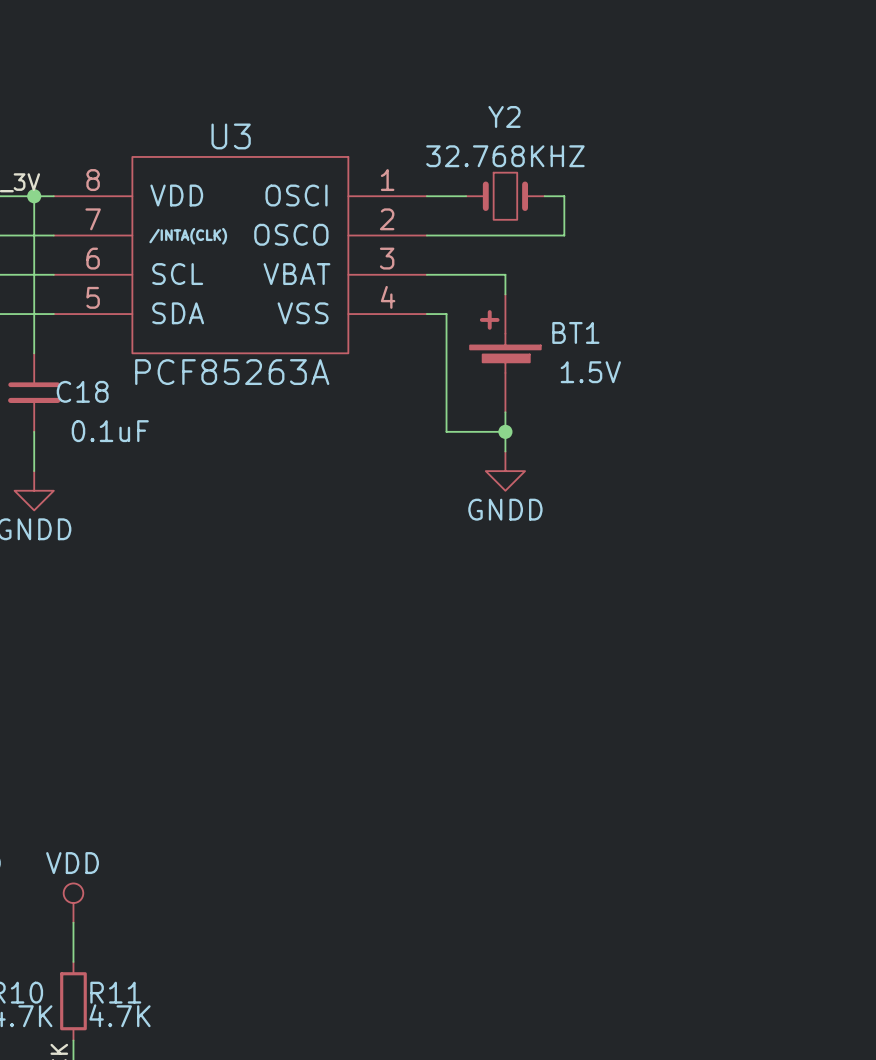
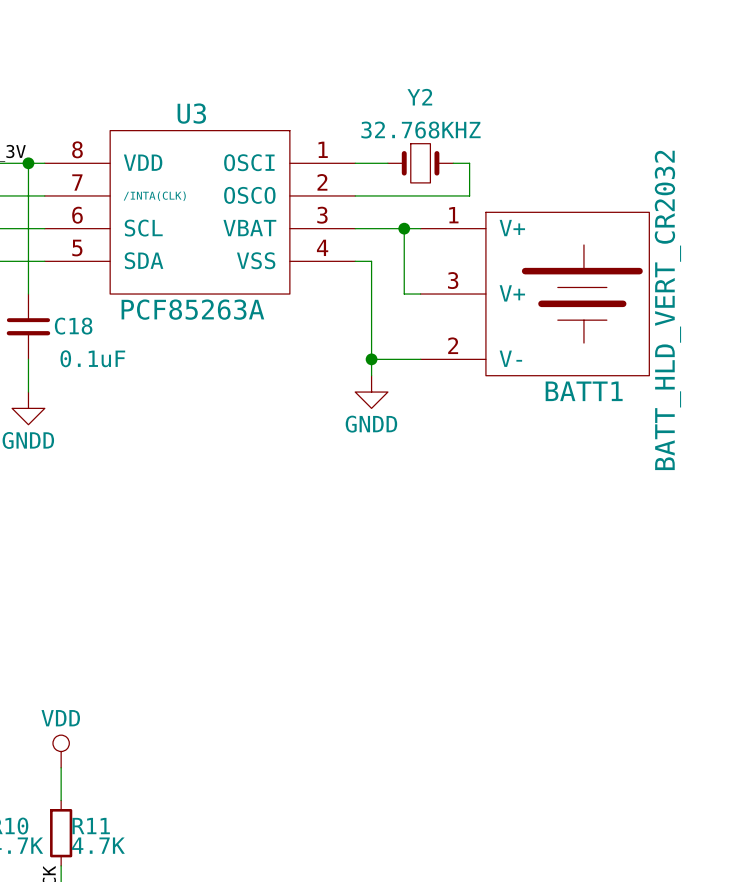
wire: none -> (404, 228) (404, 294) (420, 294)
junction: none -> (404, 228)
wire: (505, 274) (505, 294) -> (371, 359) (371, 375)
BT1: 1.5V (505, 353) -> none
BATT1: none -> BATT_HLD_VERT_CR2032 (534, 294)
wire: (505, 412) (505, 451) -> none
junction position: (505, 431) -> (371, 359)
power symbol position: GNDD (505, 471) -> GNDD (371, 392)

